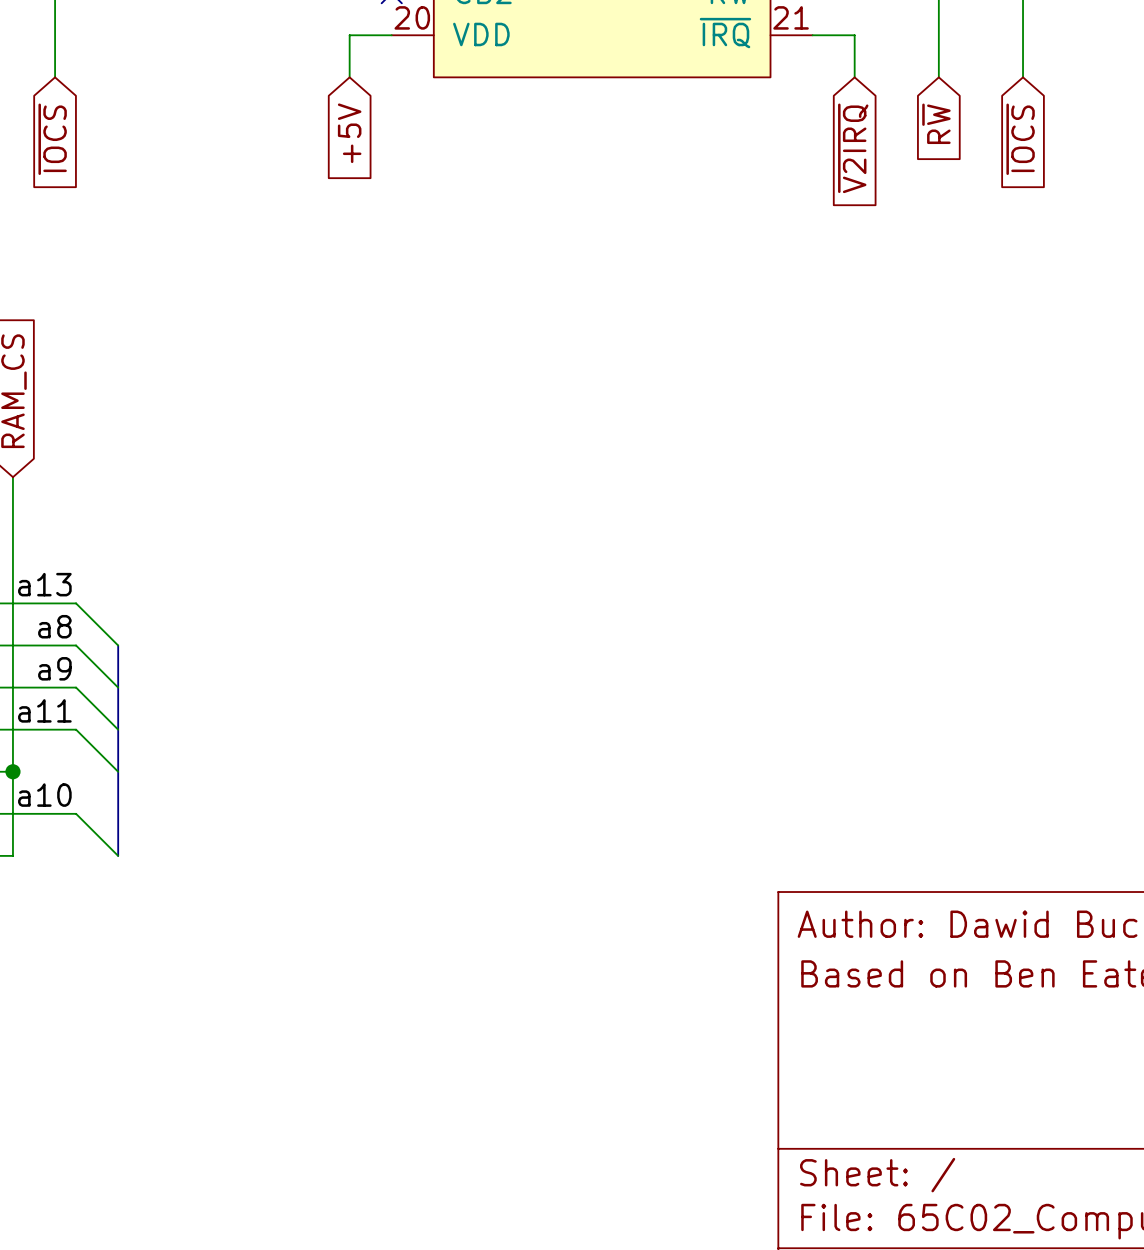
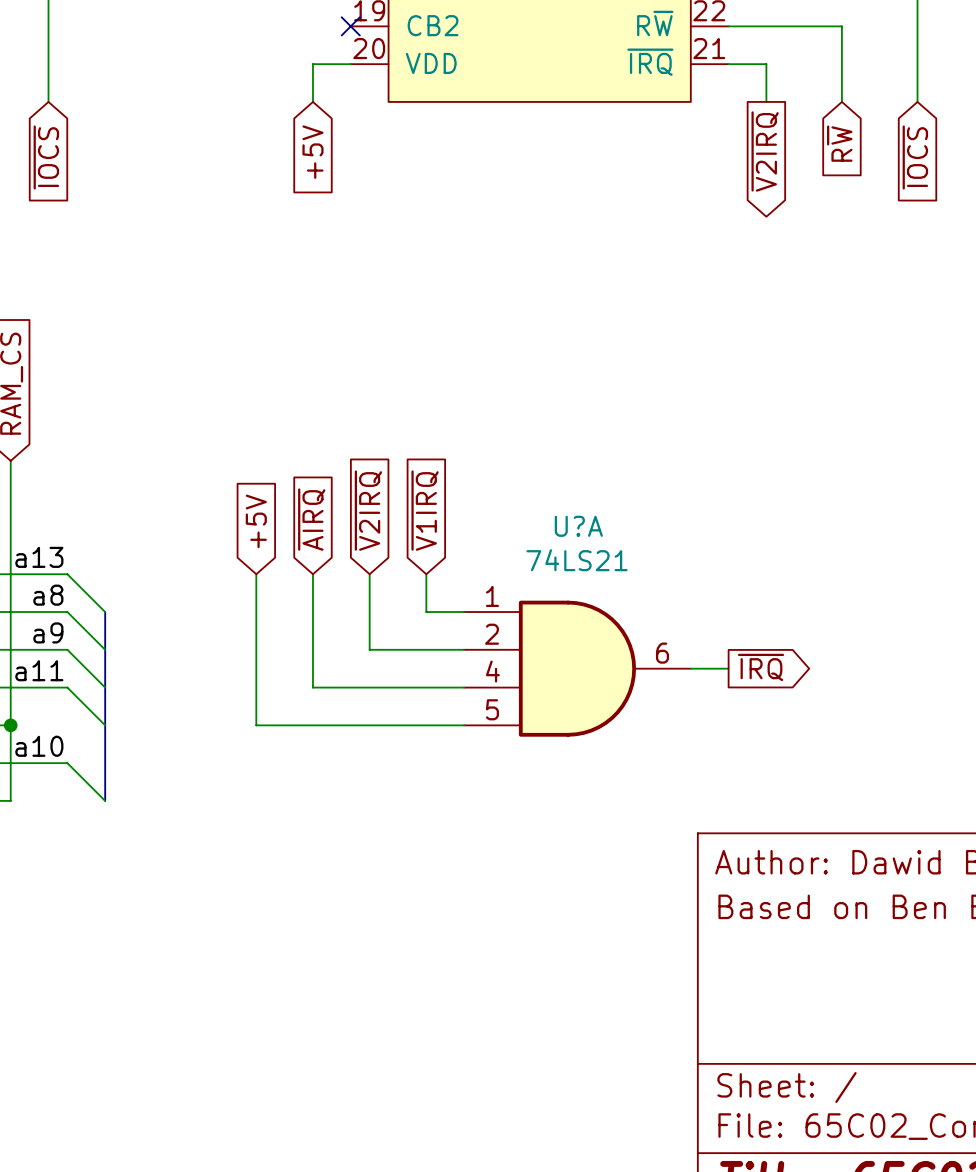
global label shape: input (853, 148) -> output (765, 151)
global label: none -> ~{V2IRQ} (368, 510)
global label: none -> ~{V1IRQ} (425, 510)
global label: none -> ~{AIRQ} (311, 519)
global label: none -> +5V (256, 521)
wire: none -> (256, 574) (256, 725) (464, 725)
wire: none -> (312, 574) (312, 687) (464, 687)
wire: none -> (369, 574) (369, 649) (464, 649)
wire: none -> (426, 574) (426, 612) (464, 612)
global label: none -> ~{IRQ} (761, 667)
U?A: none -> 74LS21 (577, 668)
wire: none -> (690, 668) (728, 668)

